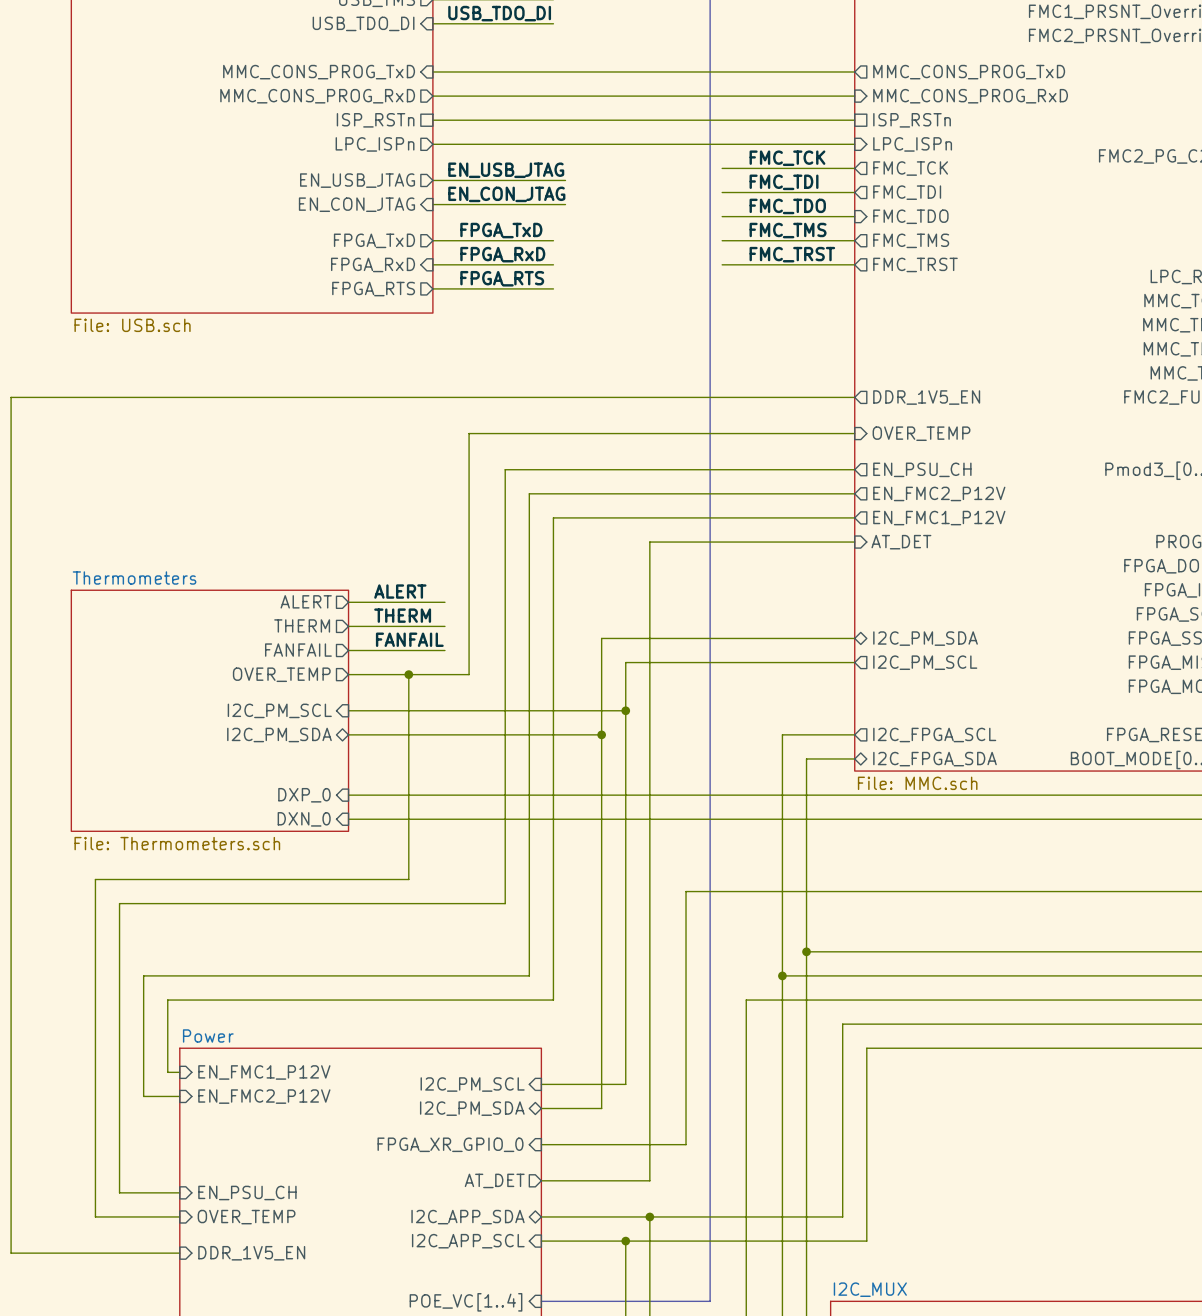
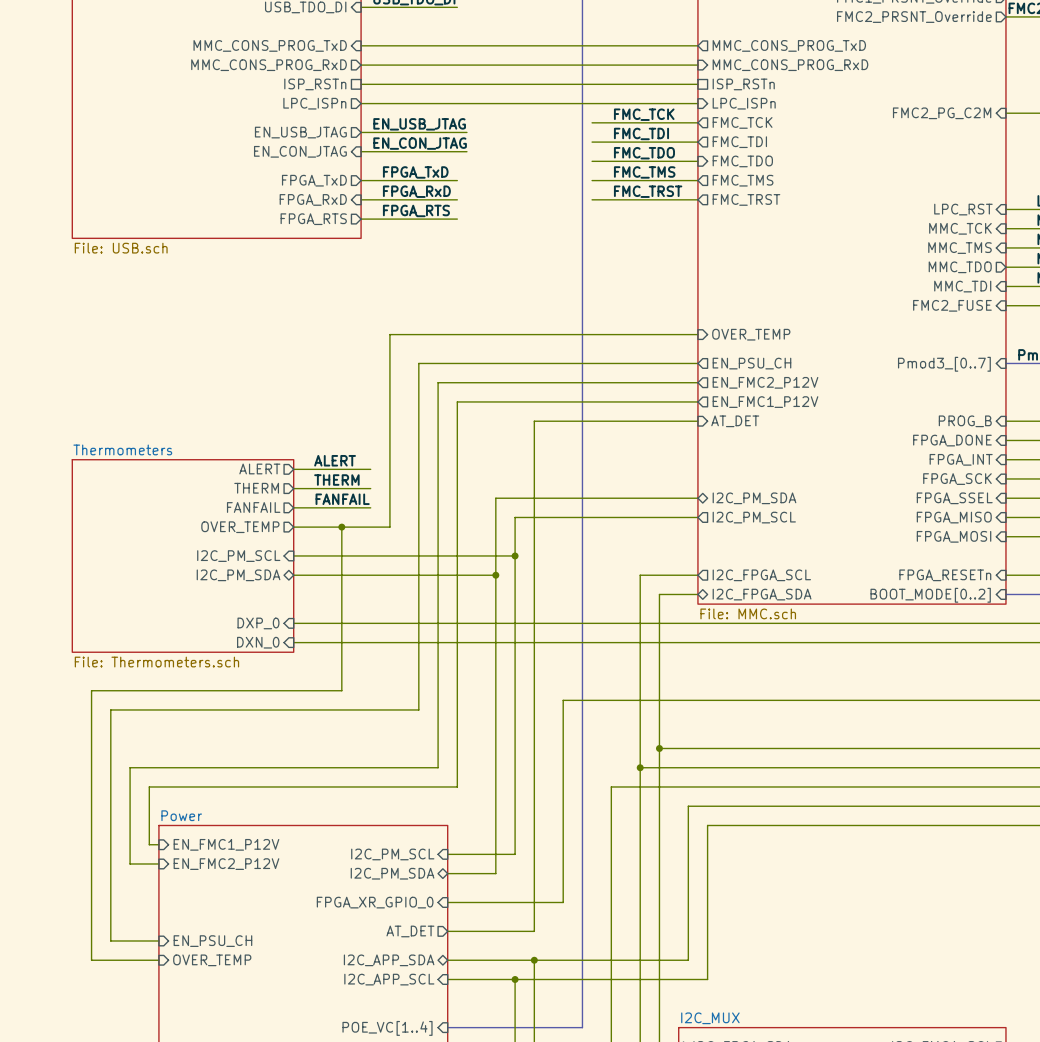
wire: (854, 397) (11, 397) (11, 1253) (179, 1253) -> none
sheet pin: DDR_1V5_EN (926, 397) -> none
sheet pin: DDR_1V5_EN (251, 1253) -> none

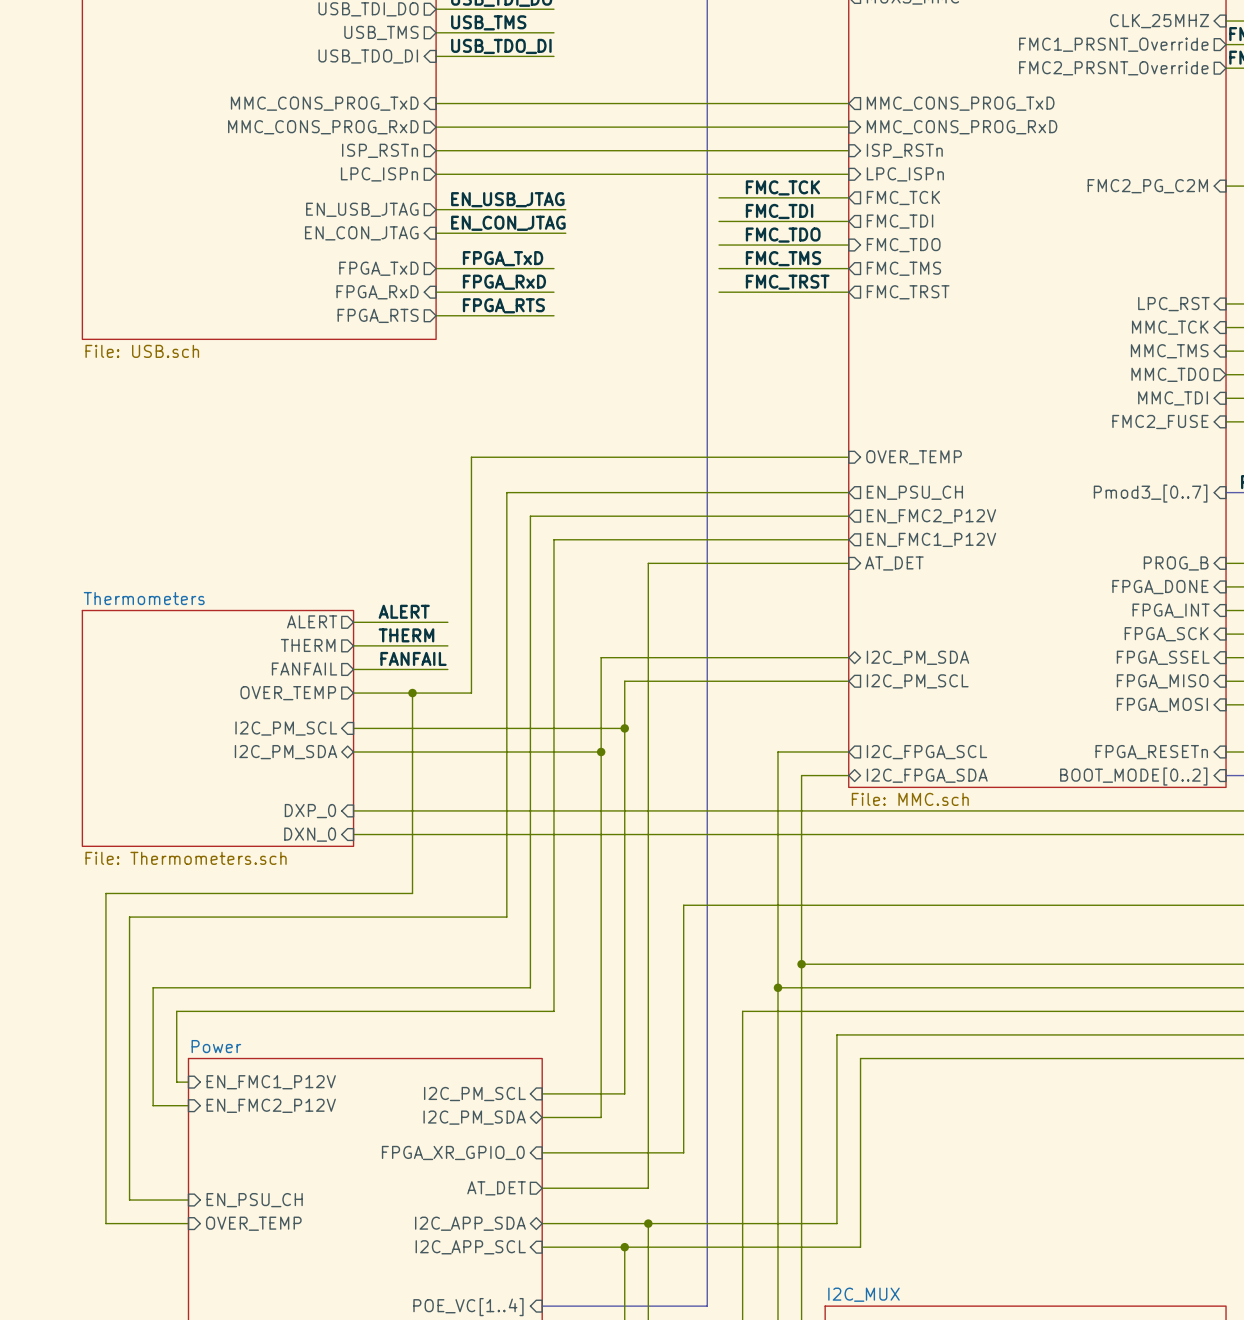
sheet pin shape: passive (315, 84) -> output (380, 150)
sheet pin shape: passive (743, 84) -> input (904, 150)

